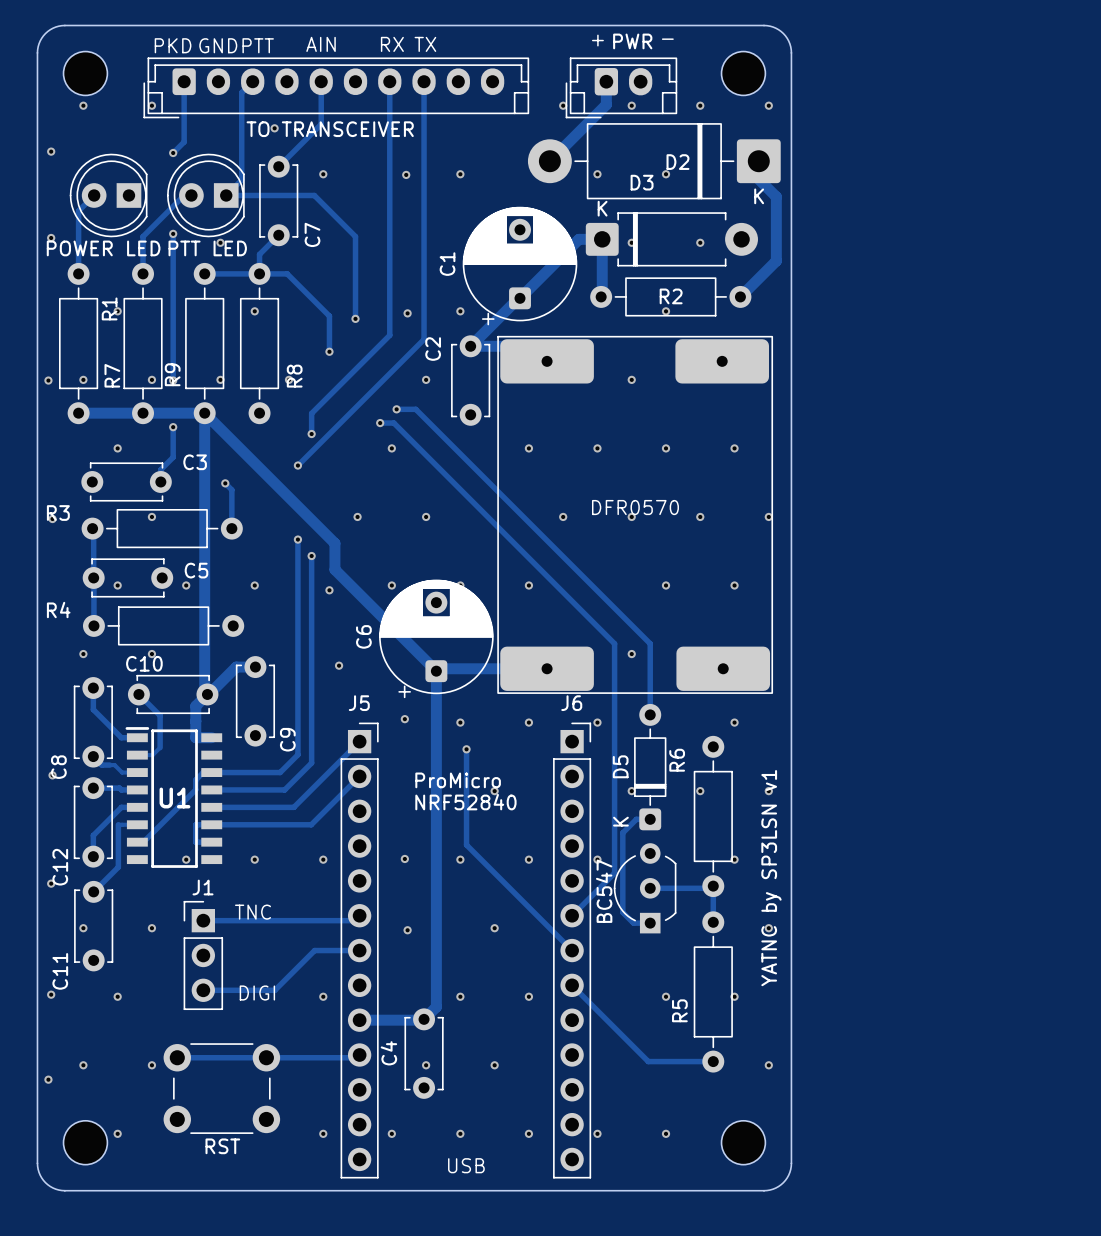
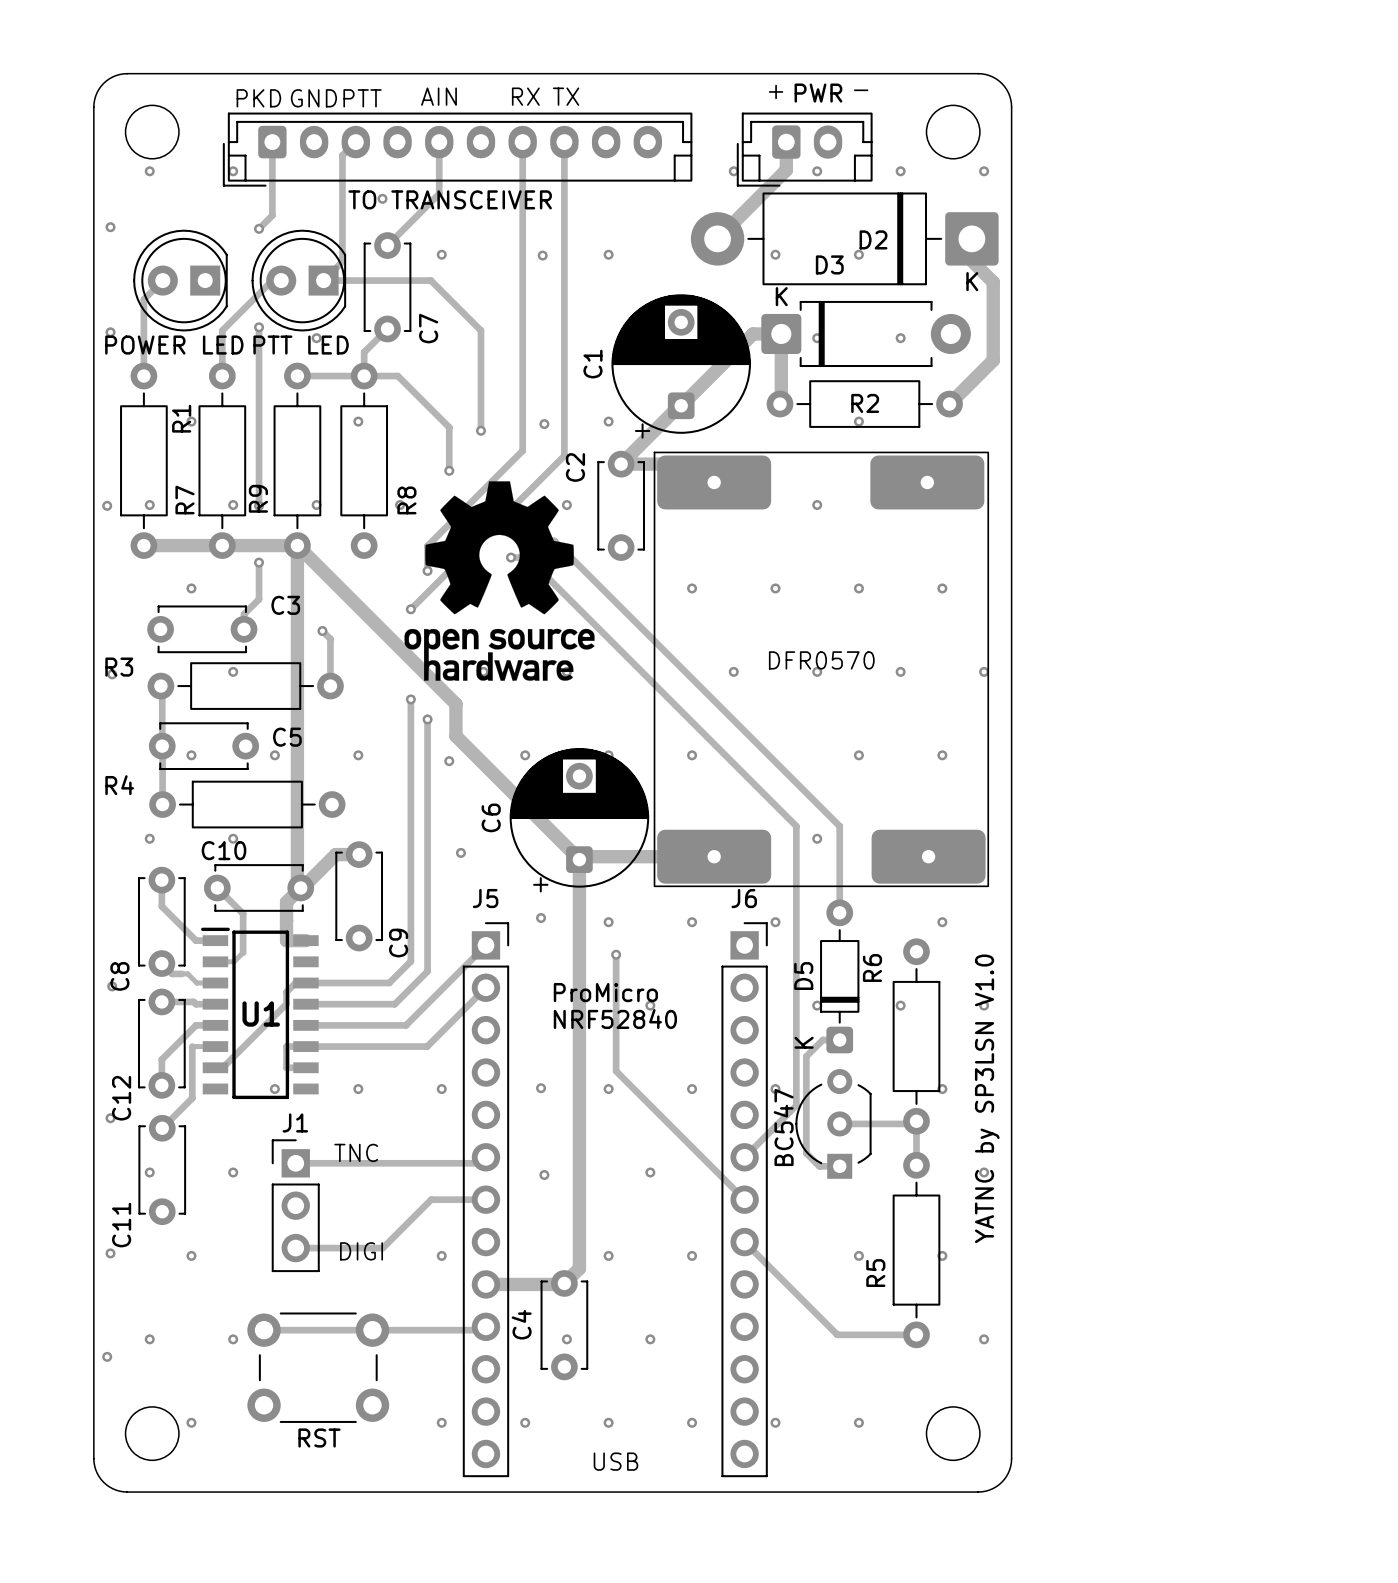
drawing: none -> [404, 481, 595, 681]
text: YATNC by SP3LSN v1 (771, 878) -> YATNC by SP3LSN V1.0 (987, 1098)

